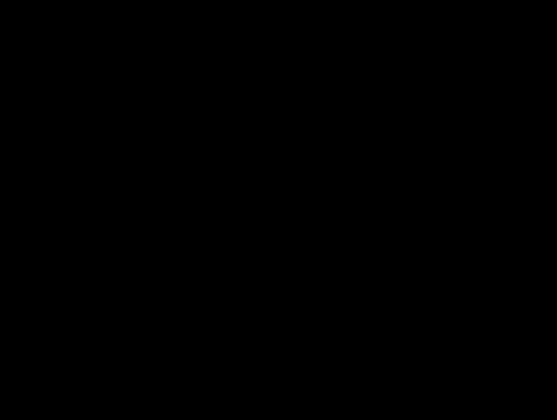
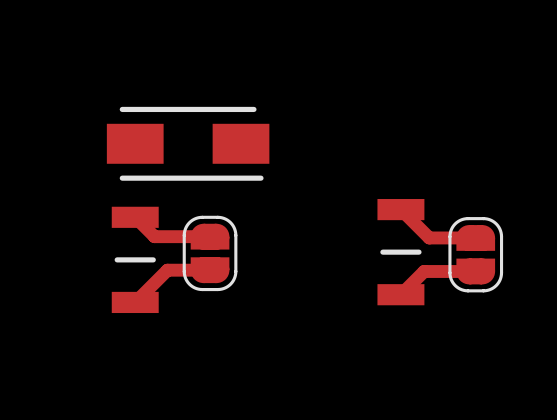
part: none -> (188, 143)
top track: none -> (400, 209) (429, 237) (475, 237)
top track: none -> (135, 217) (154, 236) (210, 236)
part: none -> (400, 252)
part: none -> (210, 253)
part: none -> (475, 254)
part: none -> (135, 259)
top track: none -> (210, 270) (167, 270) (135, 302)
top track: none -> (475, 271) (424, 271) (400, 294)

